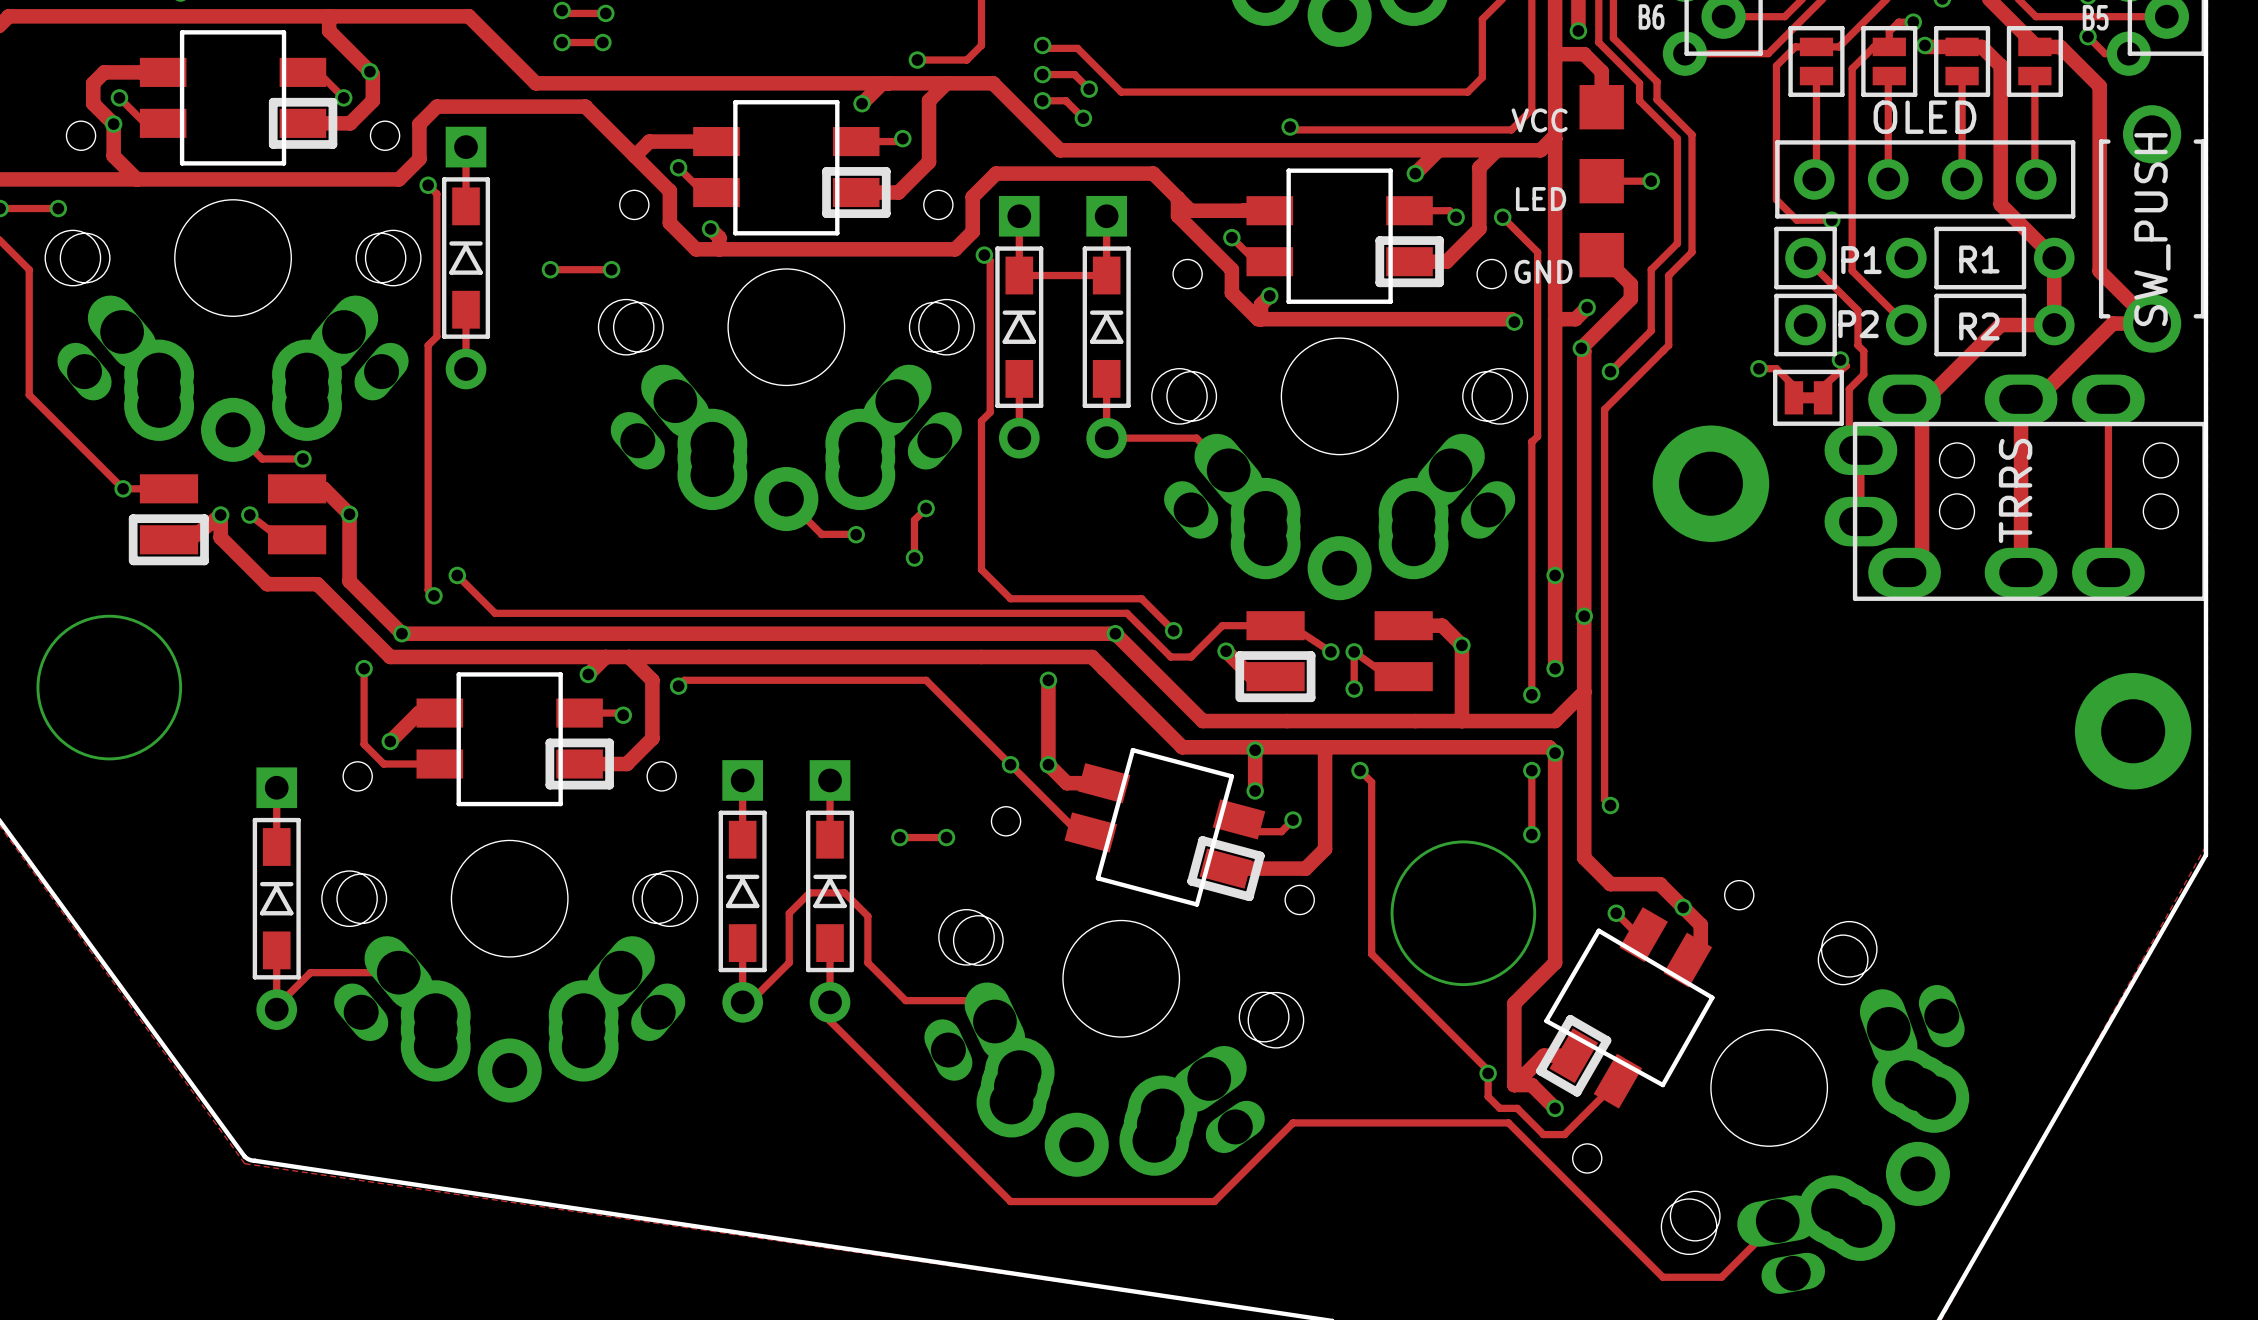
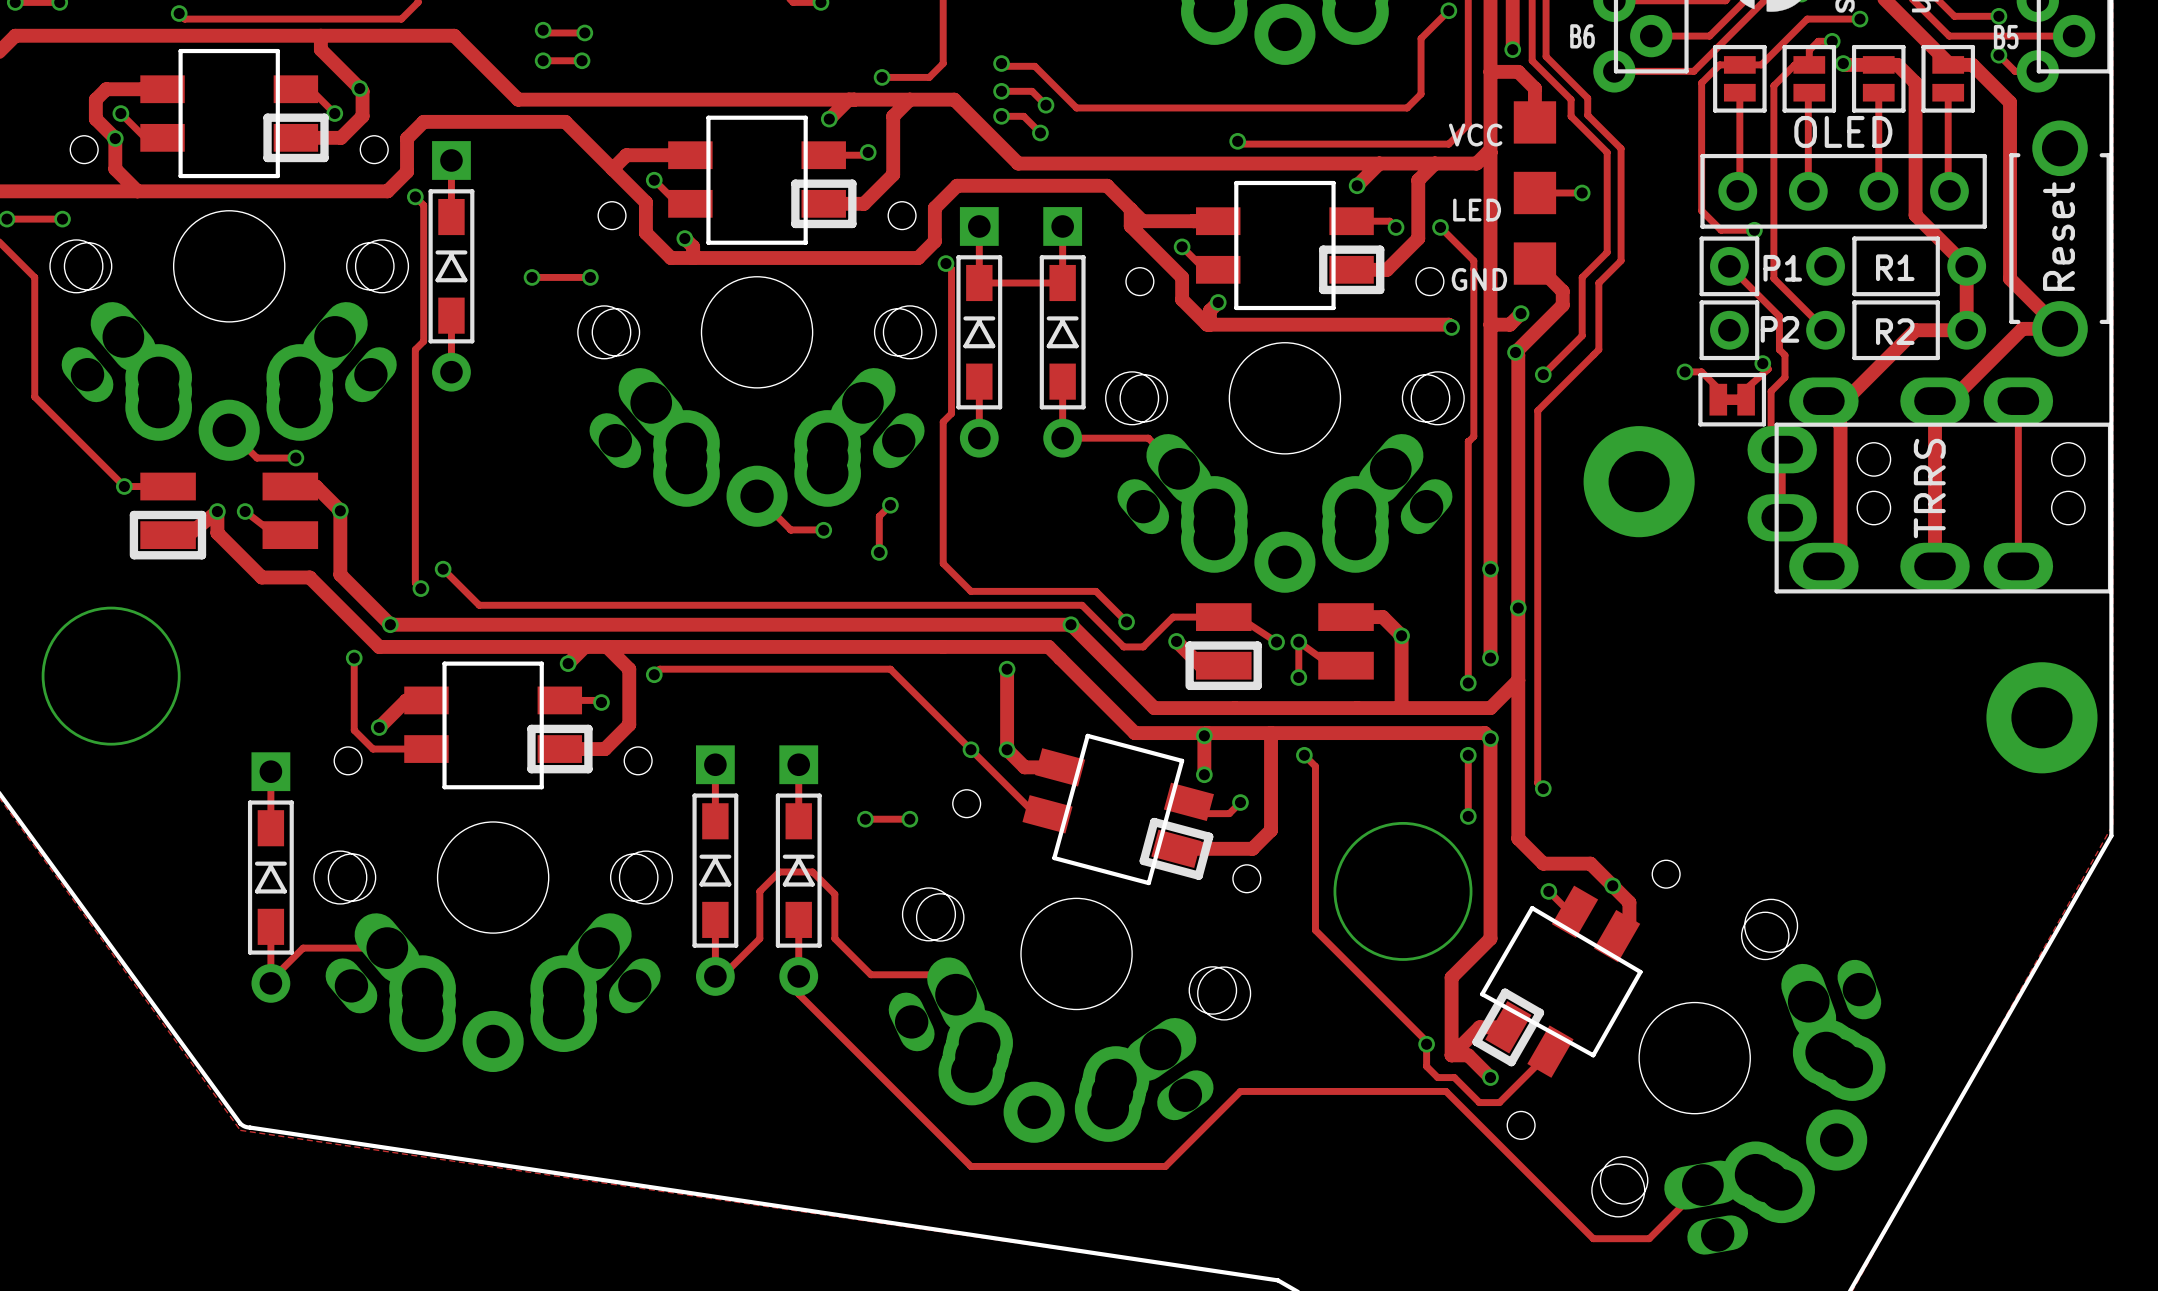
part value: SW_PUSH (2152, 229) -> Reset (2058, 236)

